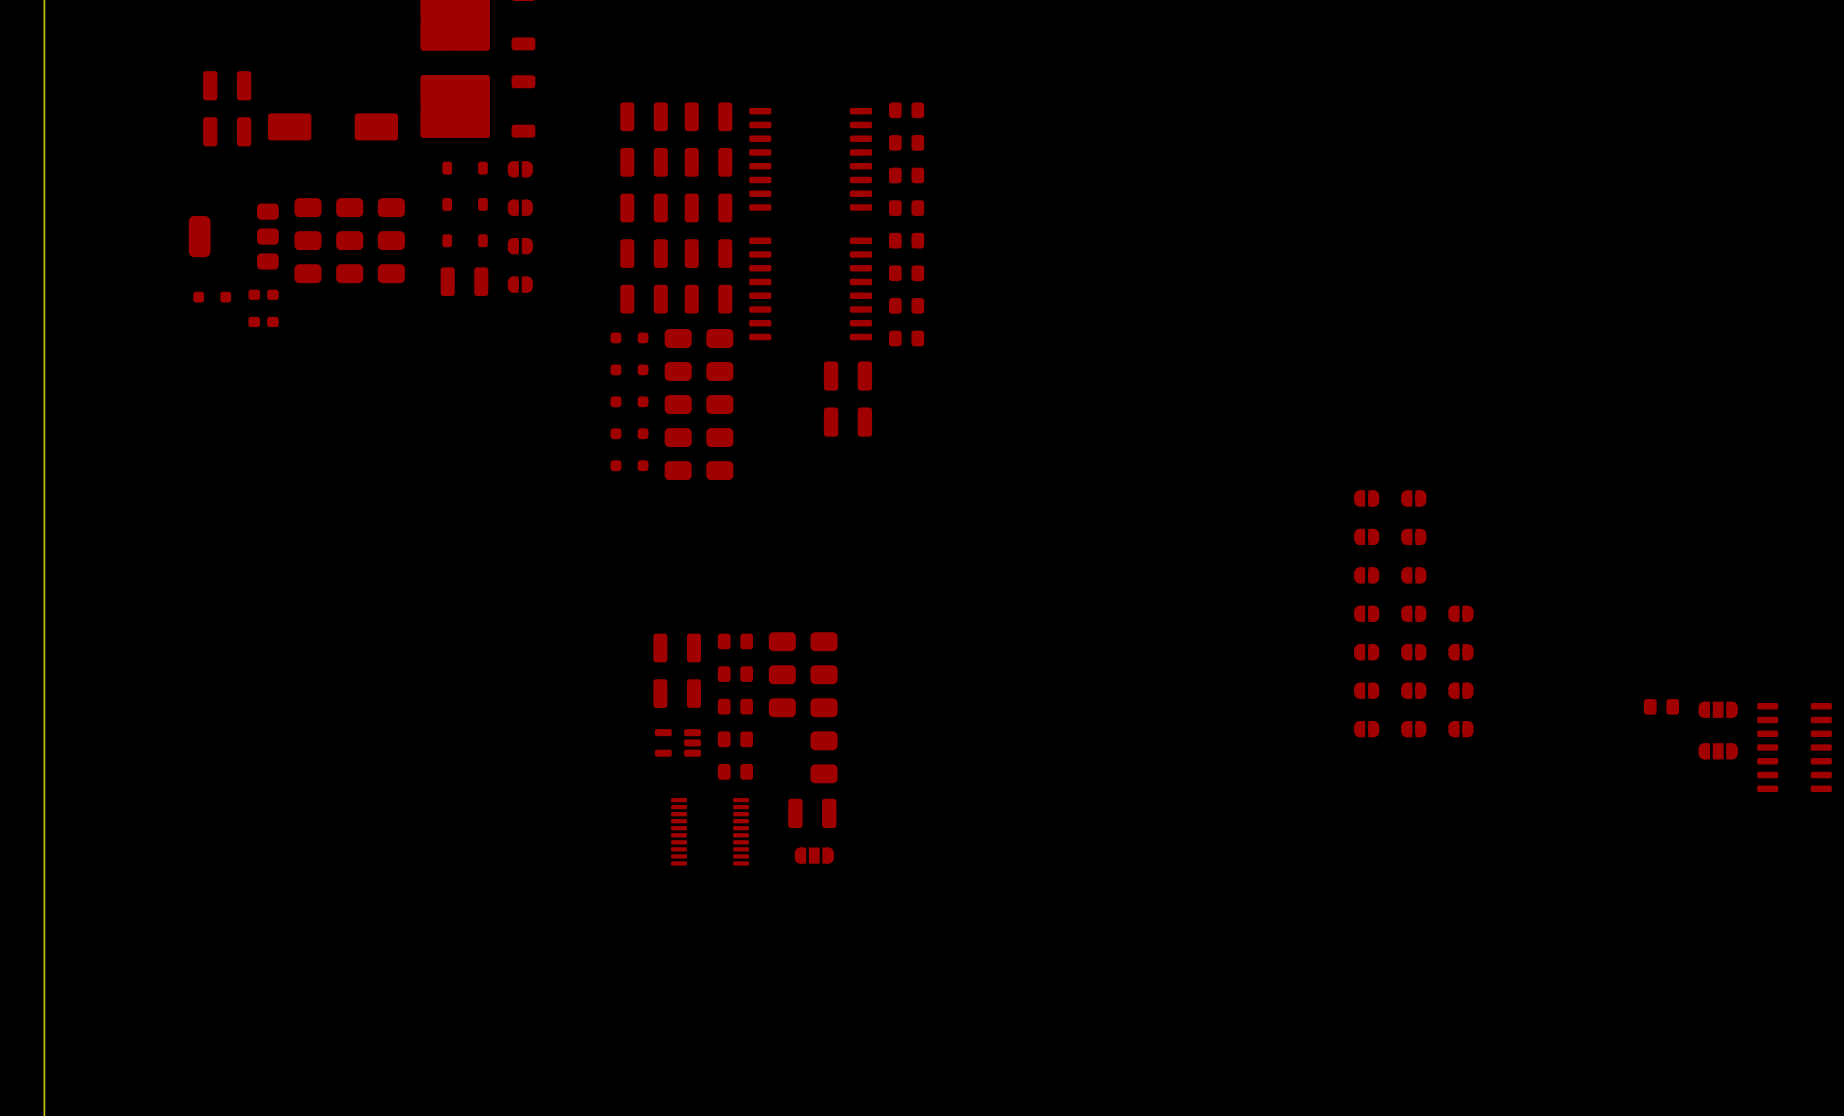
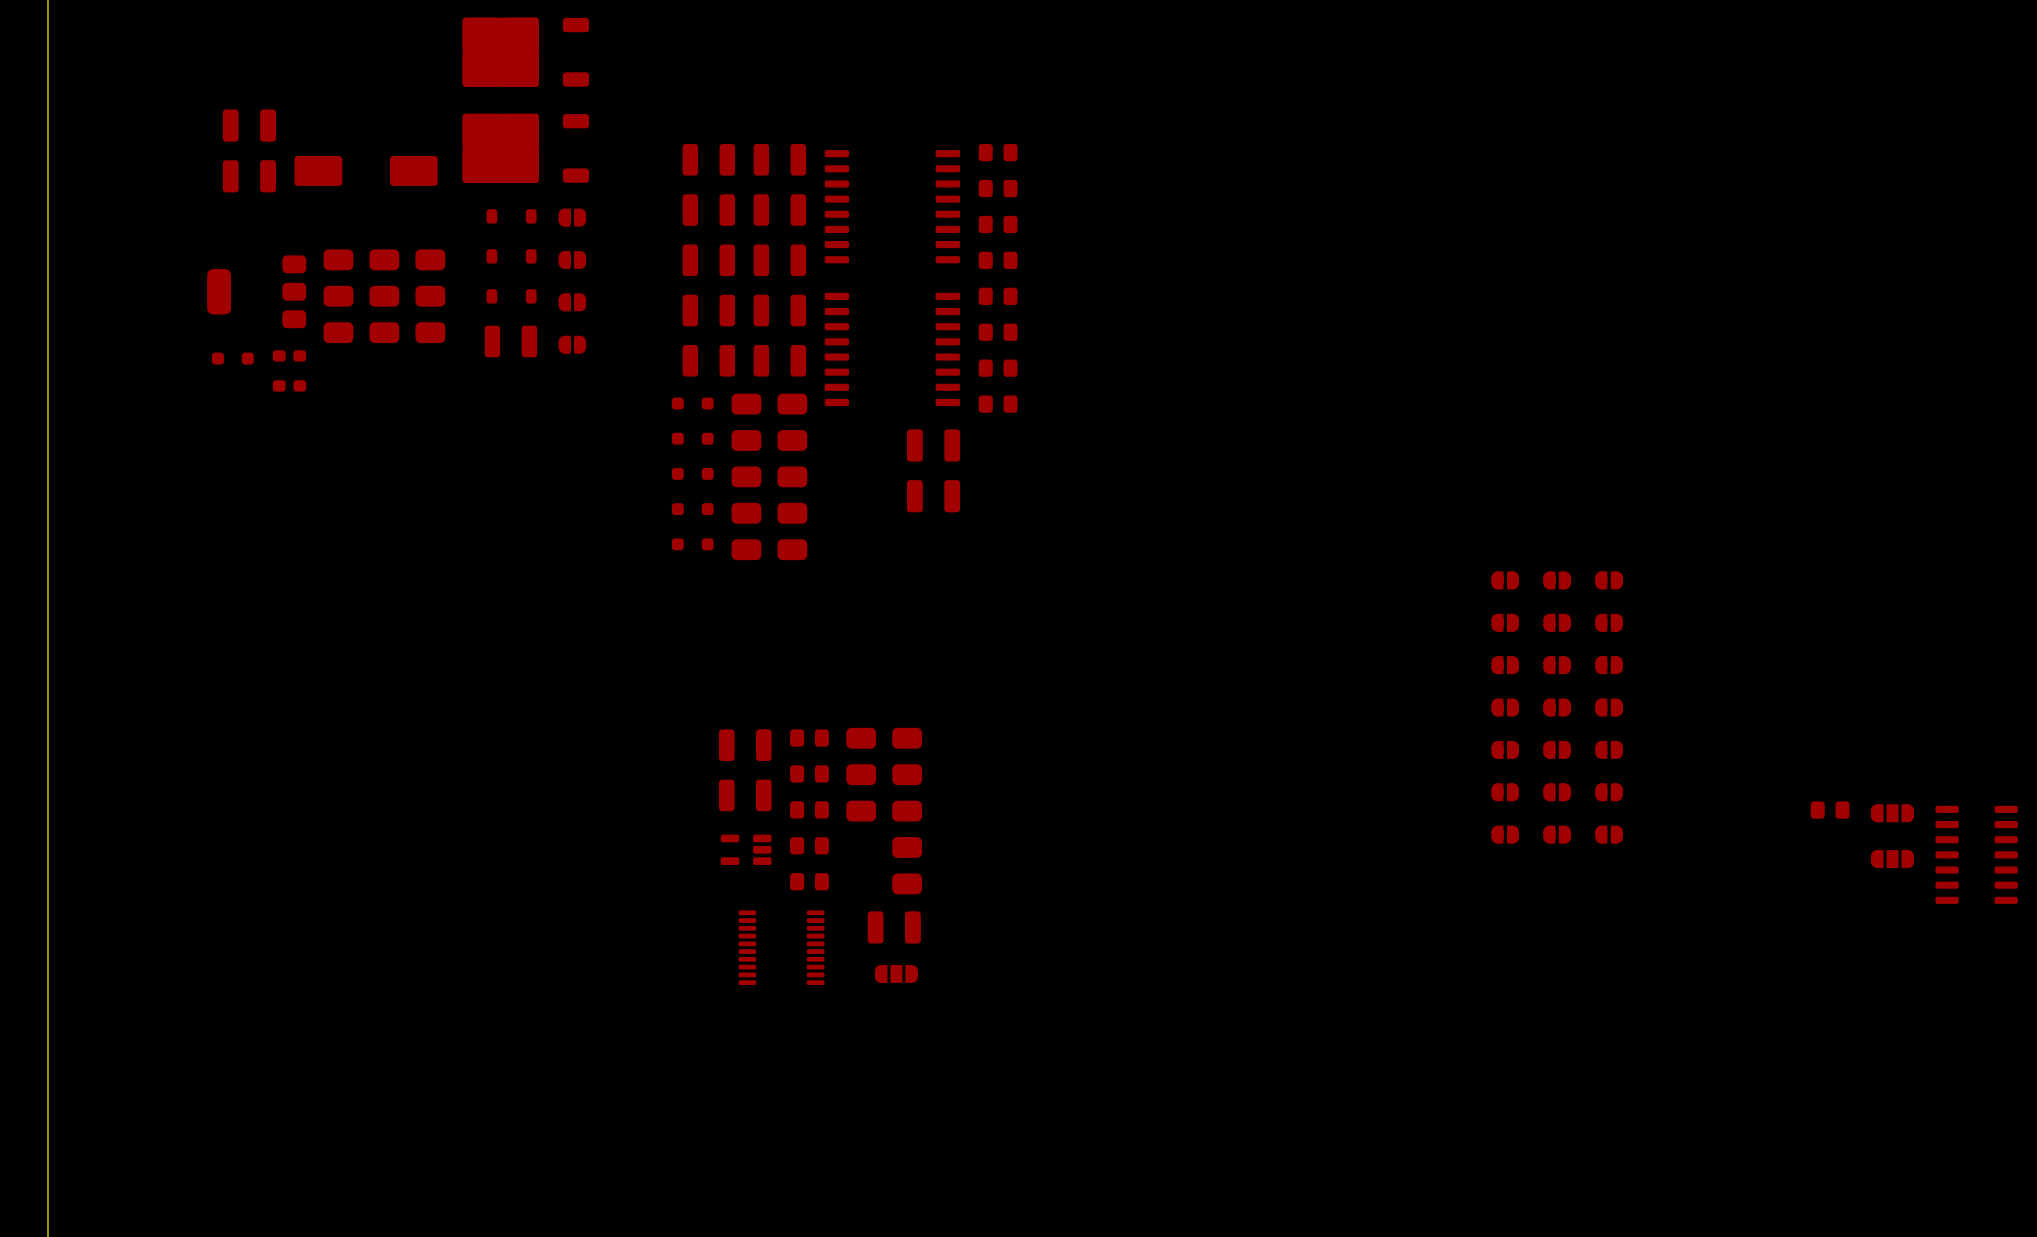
part: none -> (1609, 580)
part: none -> (1609, 622)
part: none -> (1609, 665)

